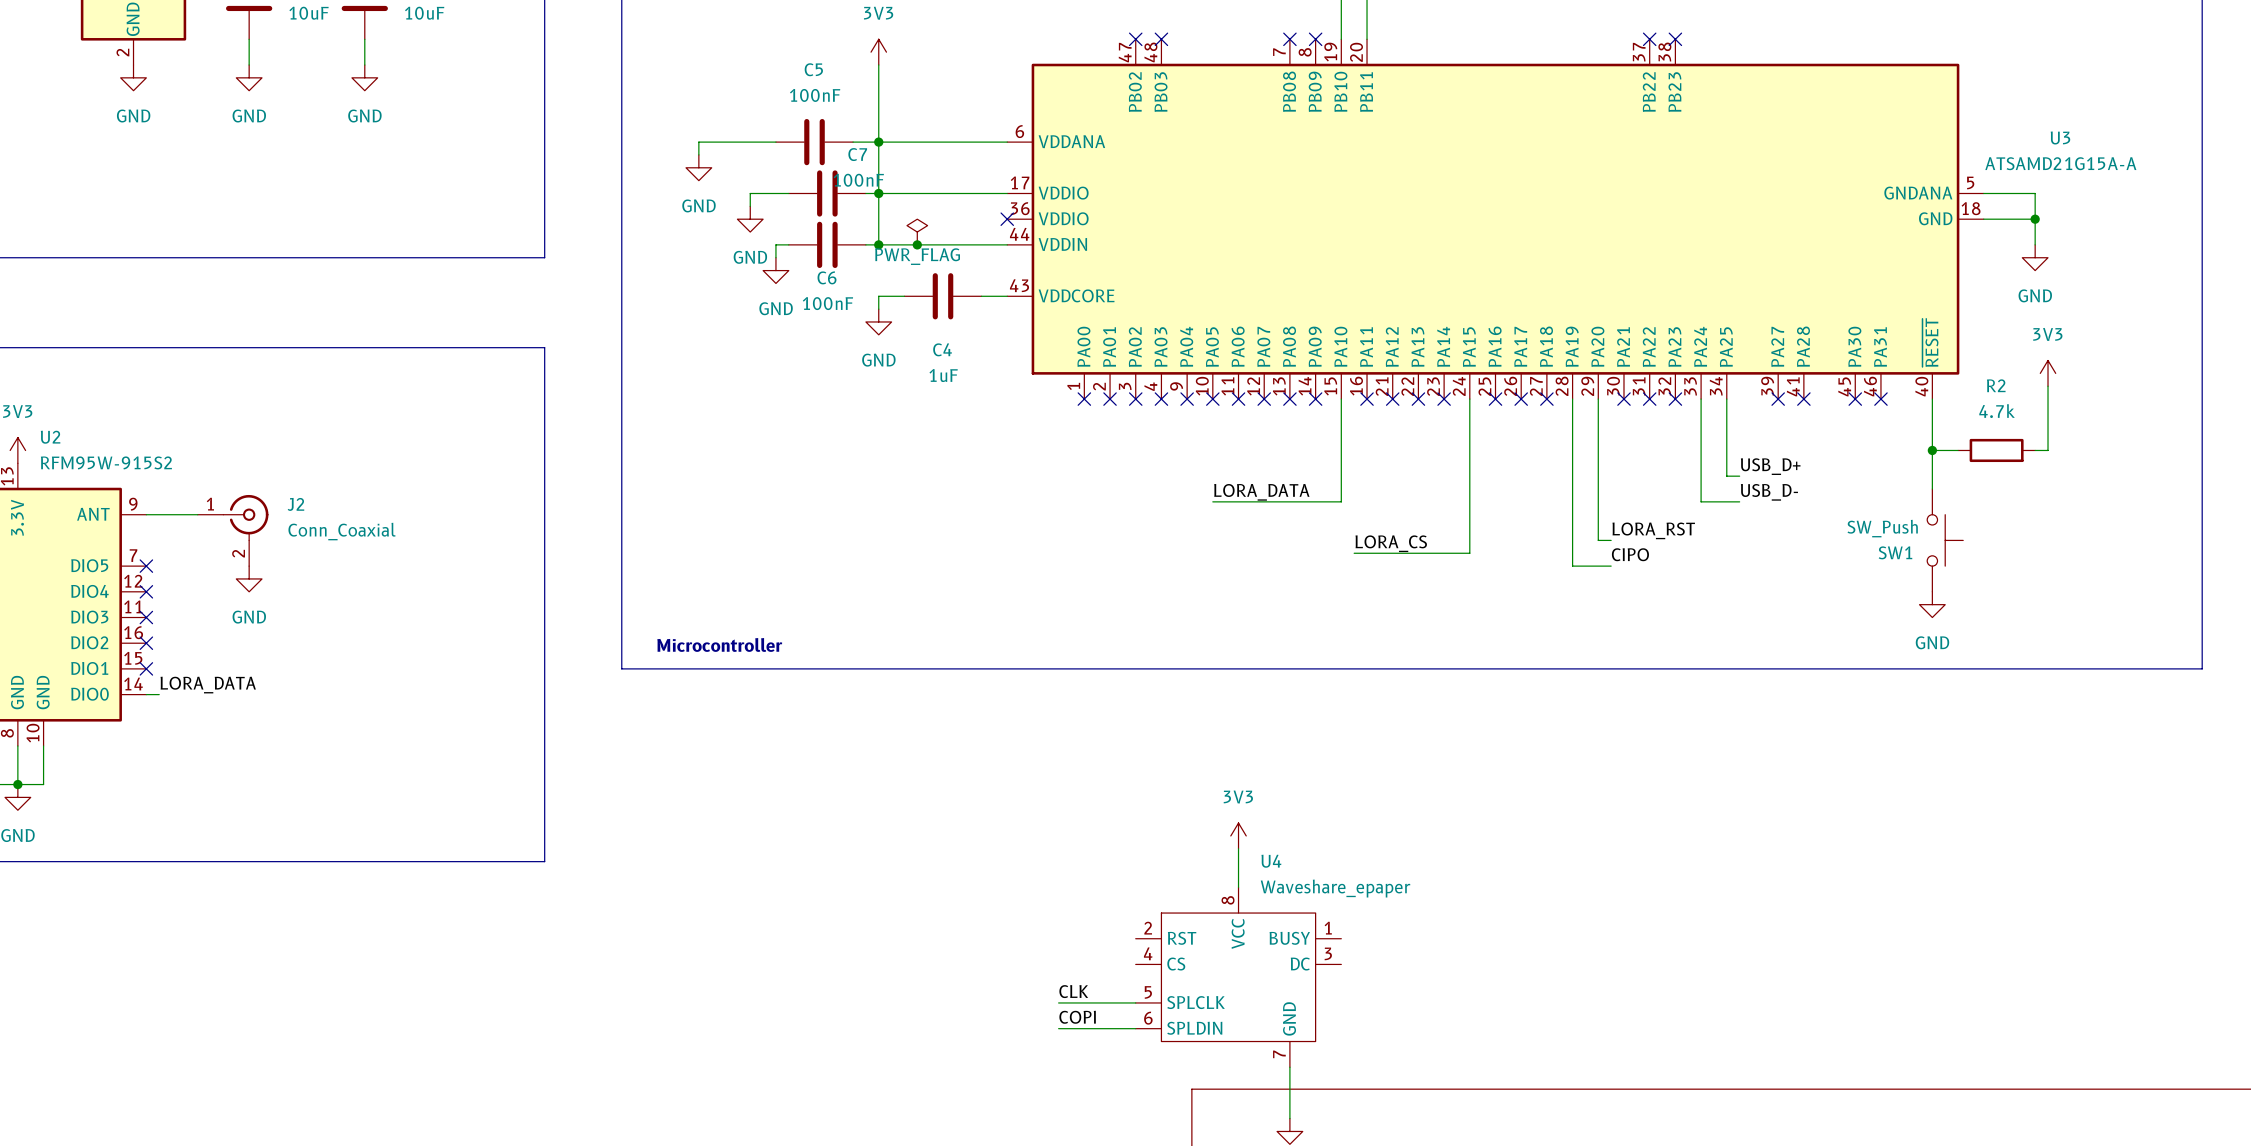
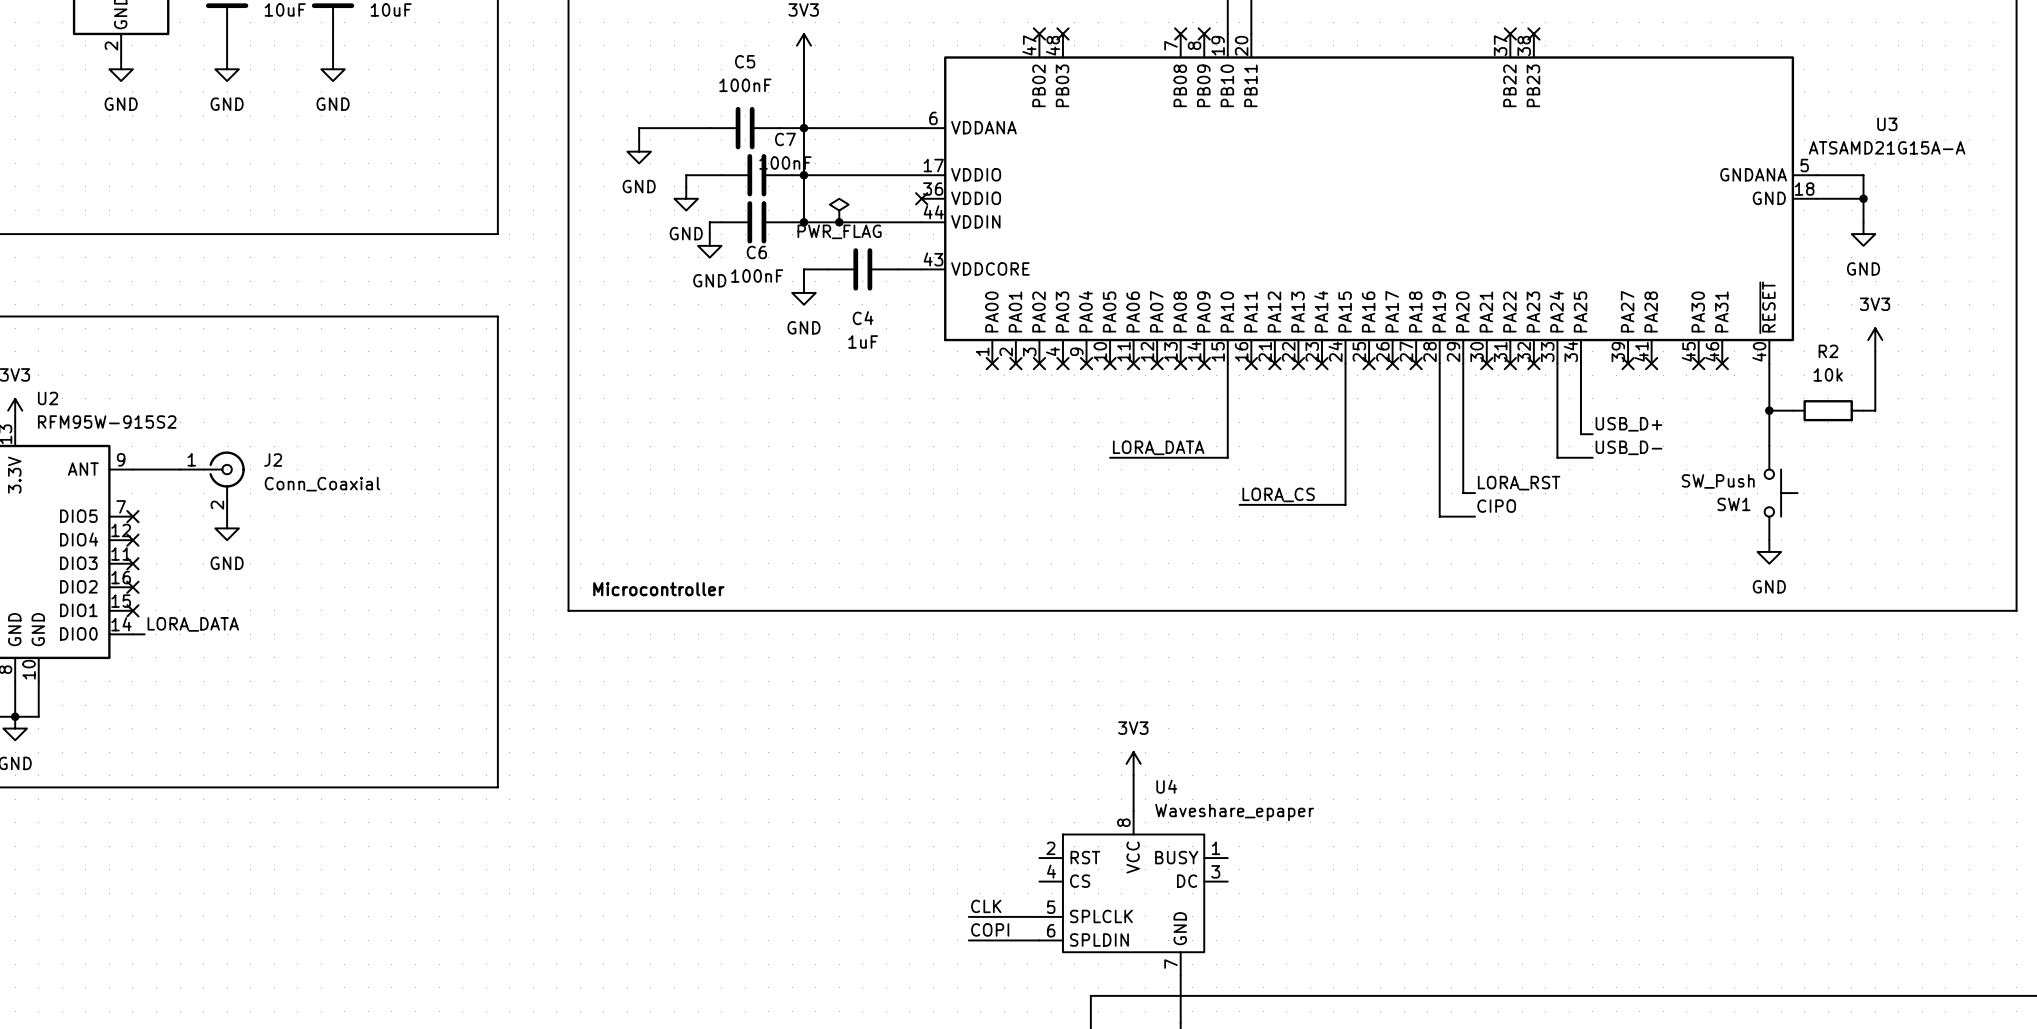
R2 value: 4.7k (1997, 411) -> 10k (1828, 374)

